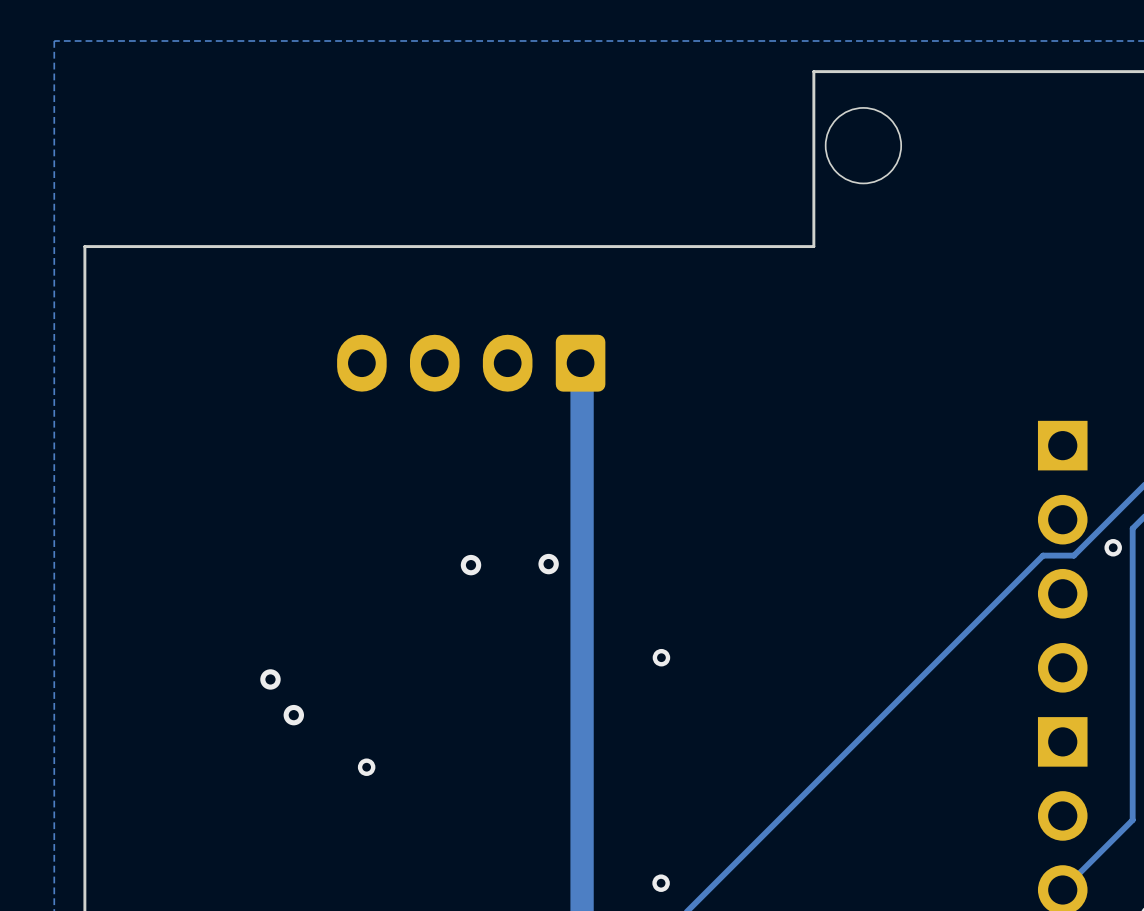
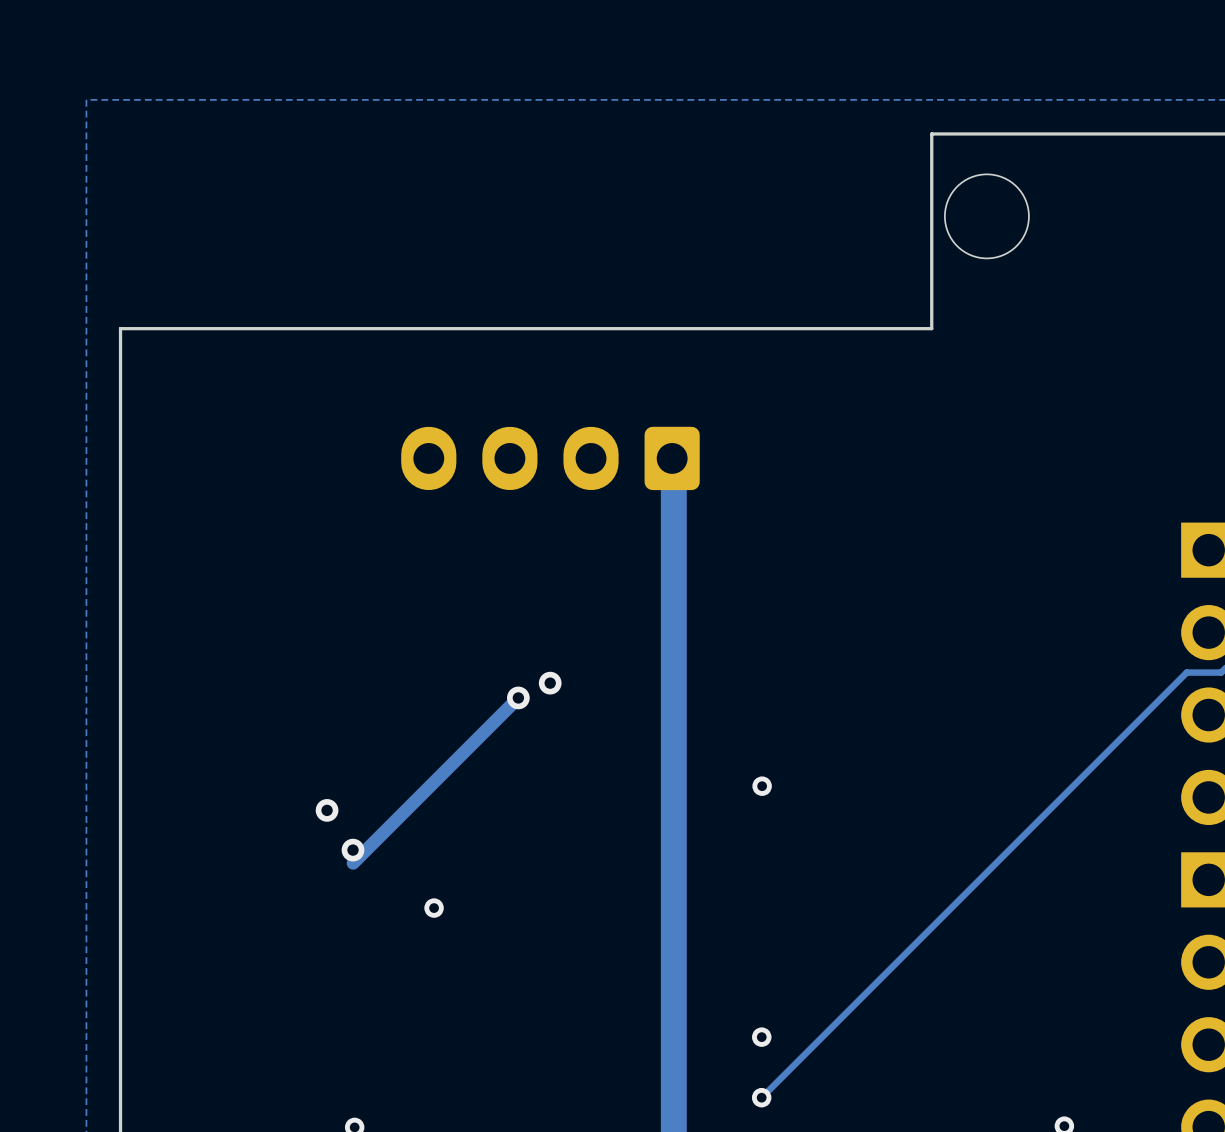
via position: (548, 564) -> (518, 697)
track: none -> (518, 697) (353, 863)

